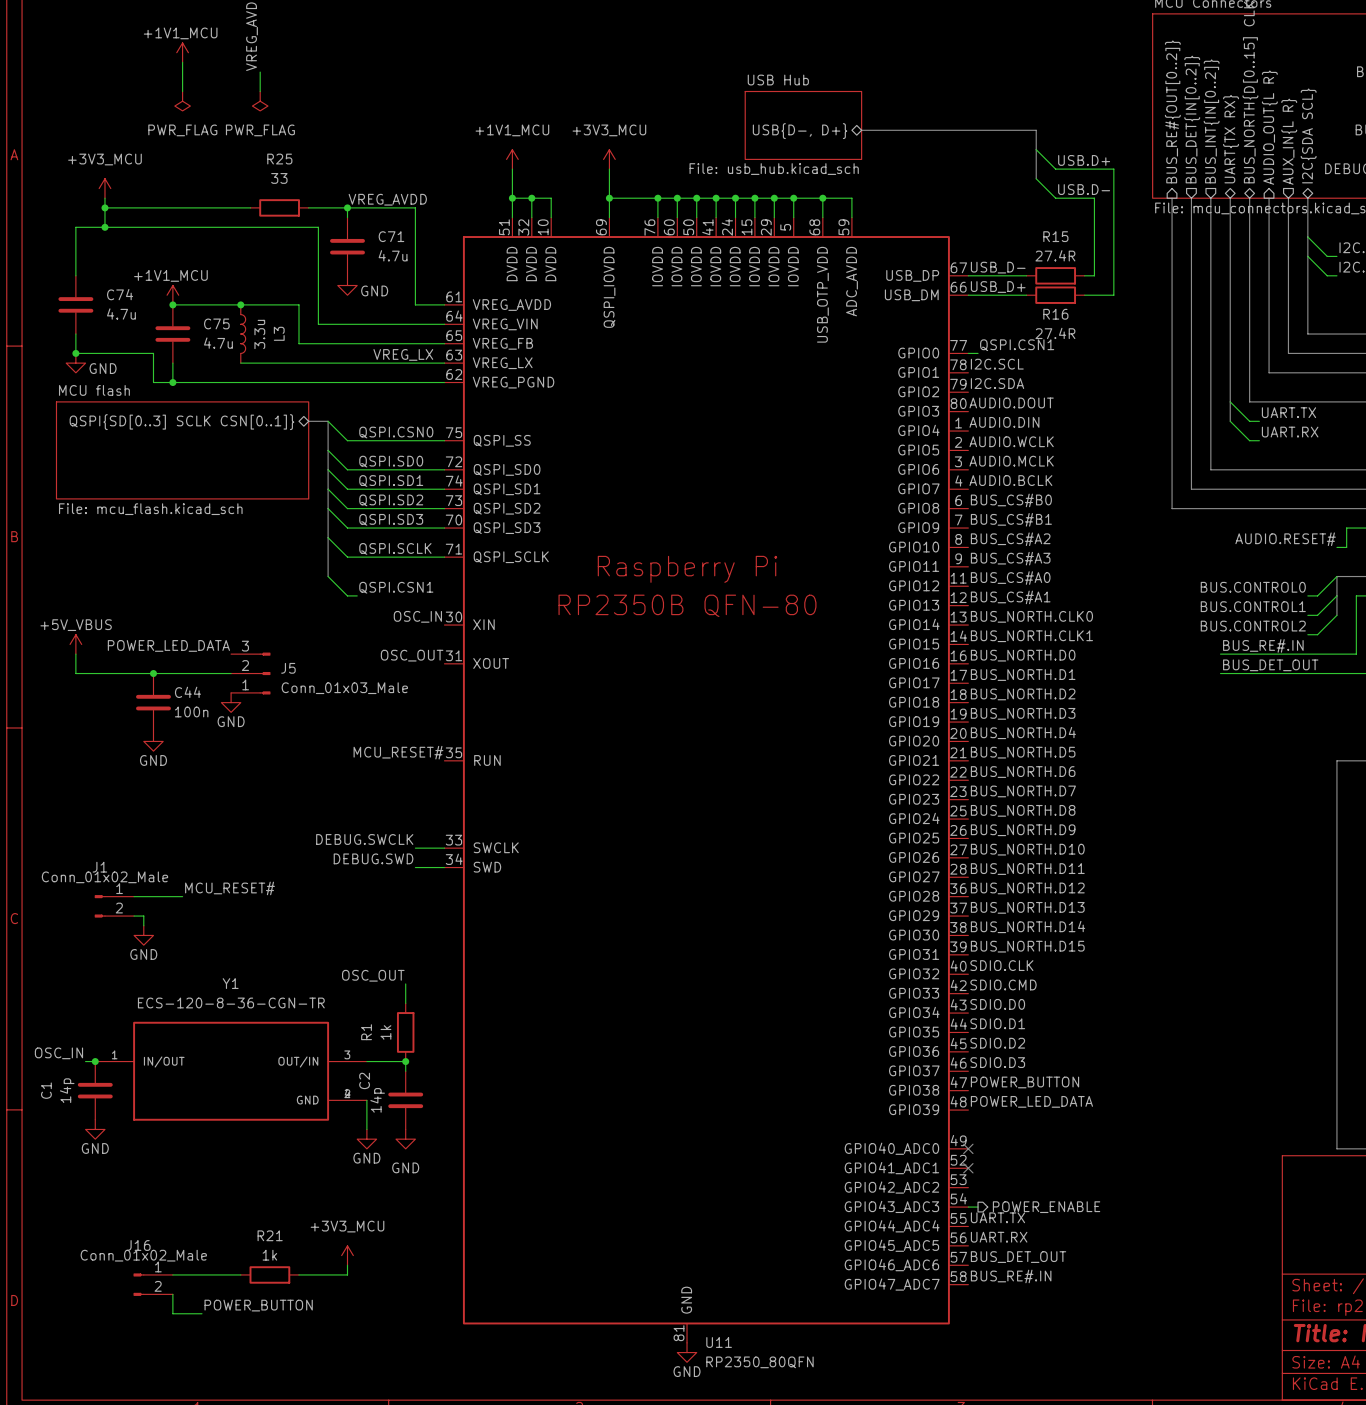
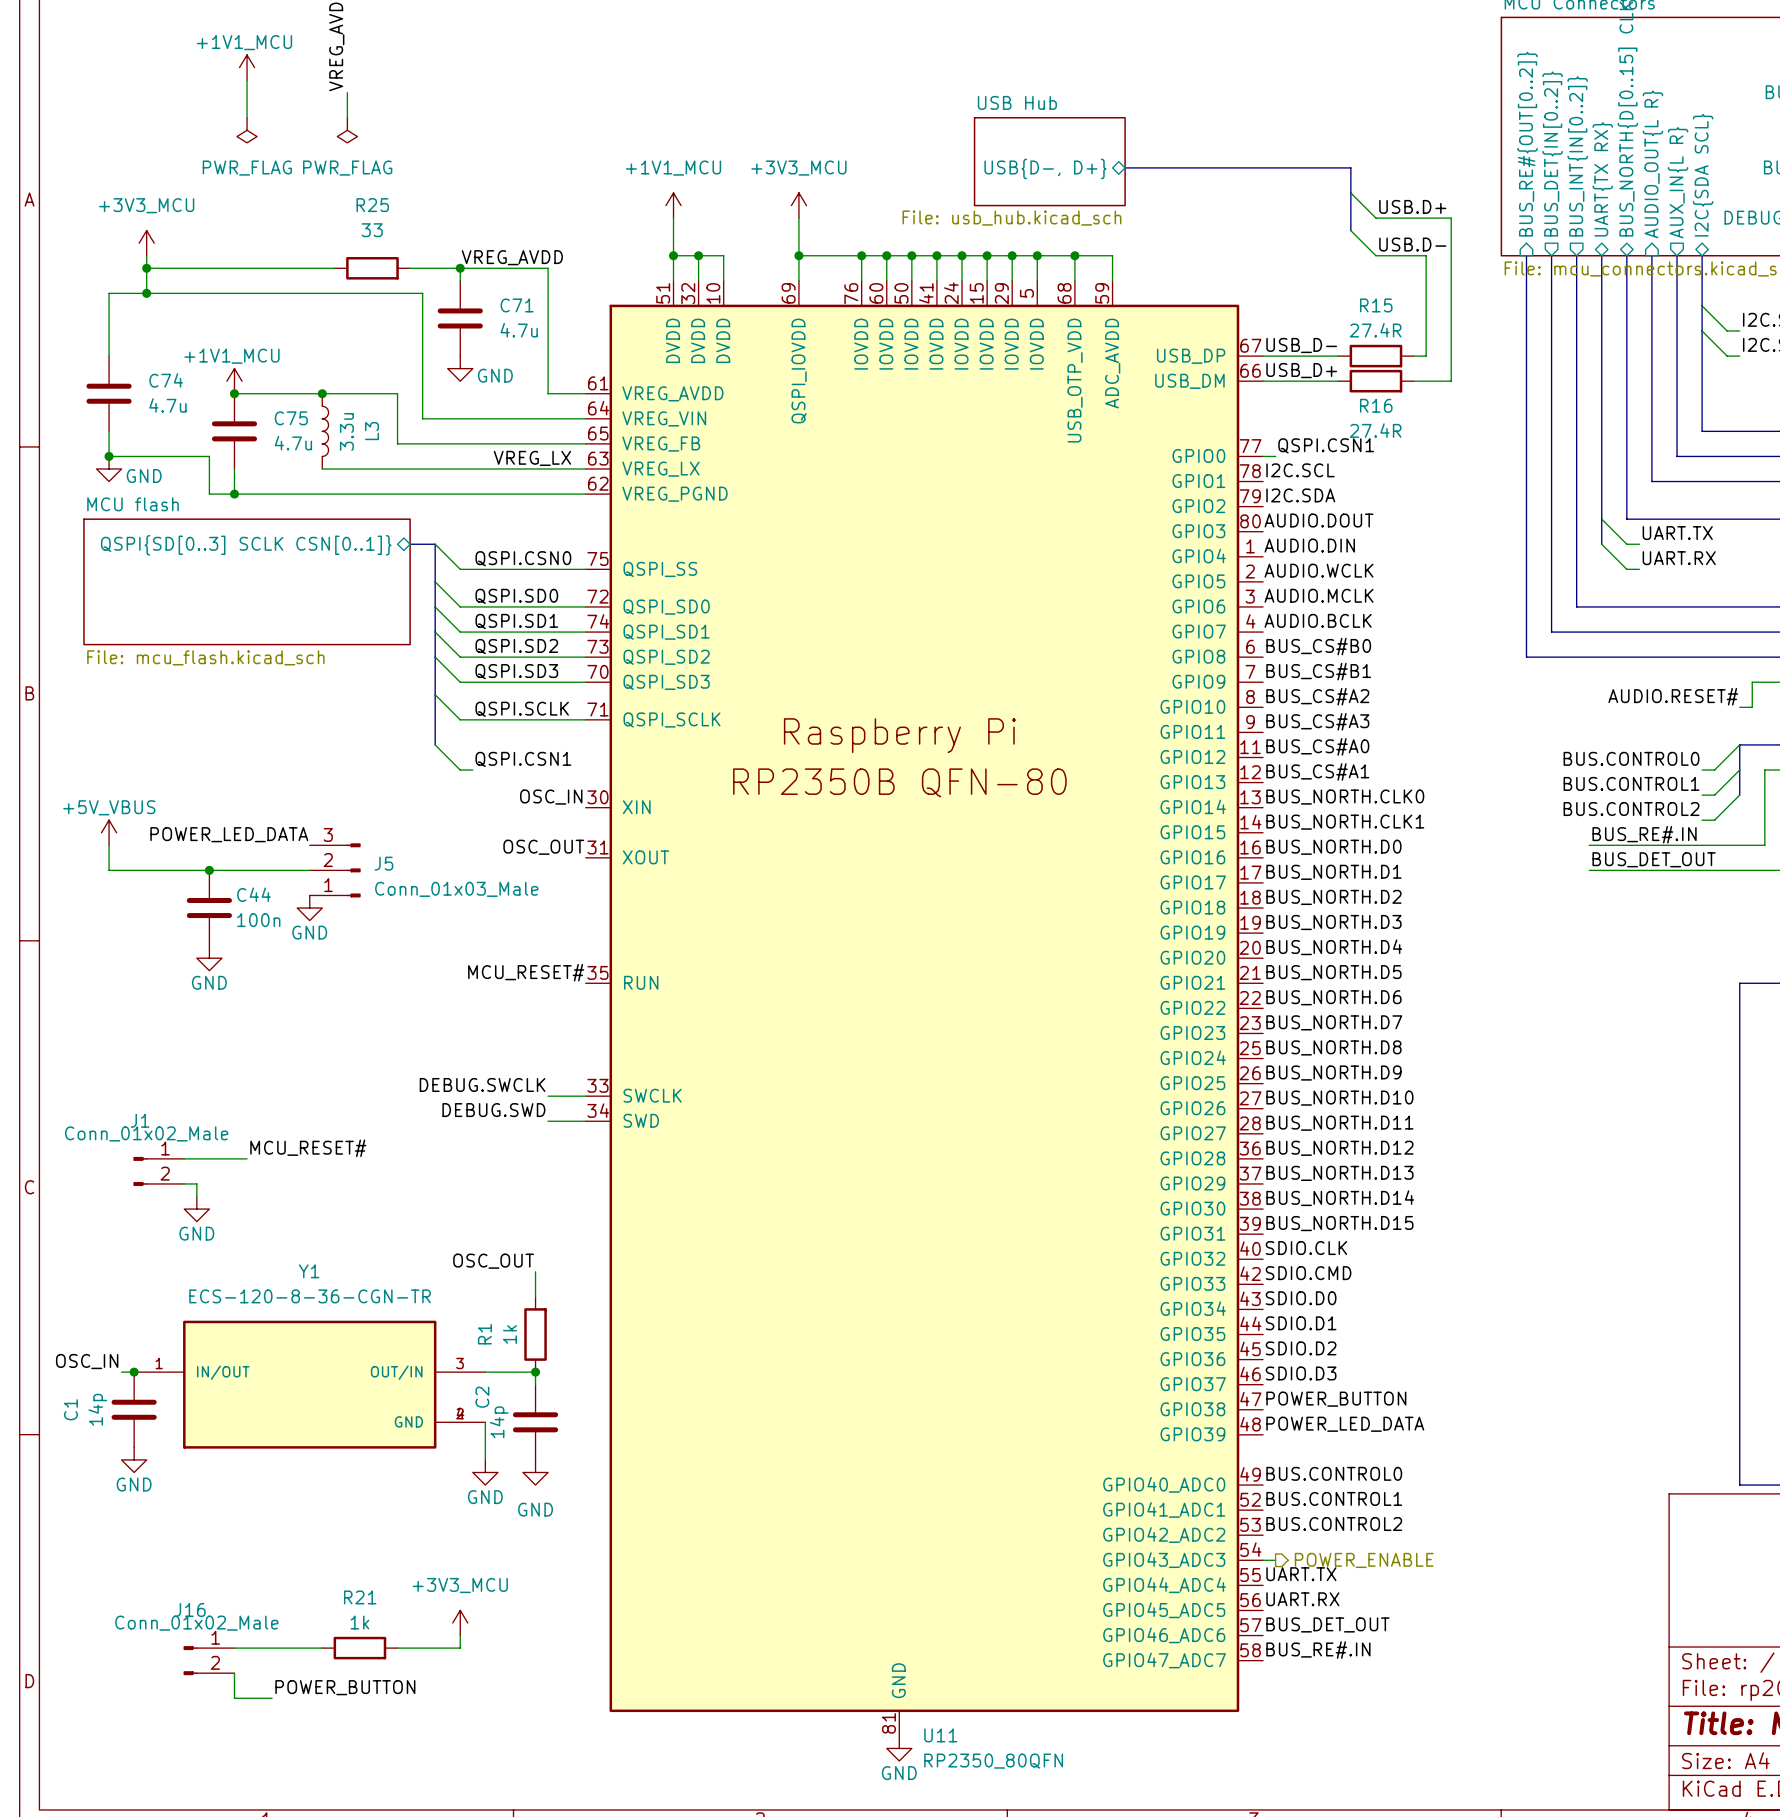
label: none -> BUS.CONTROL0 (1334, 1473)
no-connect mark: (968, 1148) -> none
label: none -> BUS.CONTROL1 (1334, 1498)
no-connect mark: (968, 1168) -> none
label: none -> BUS.CONTROL2 (1334, 1524)

